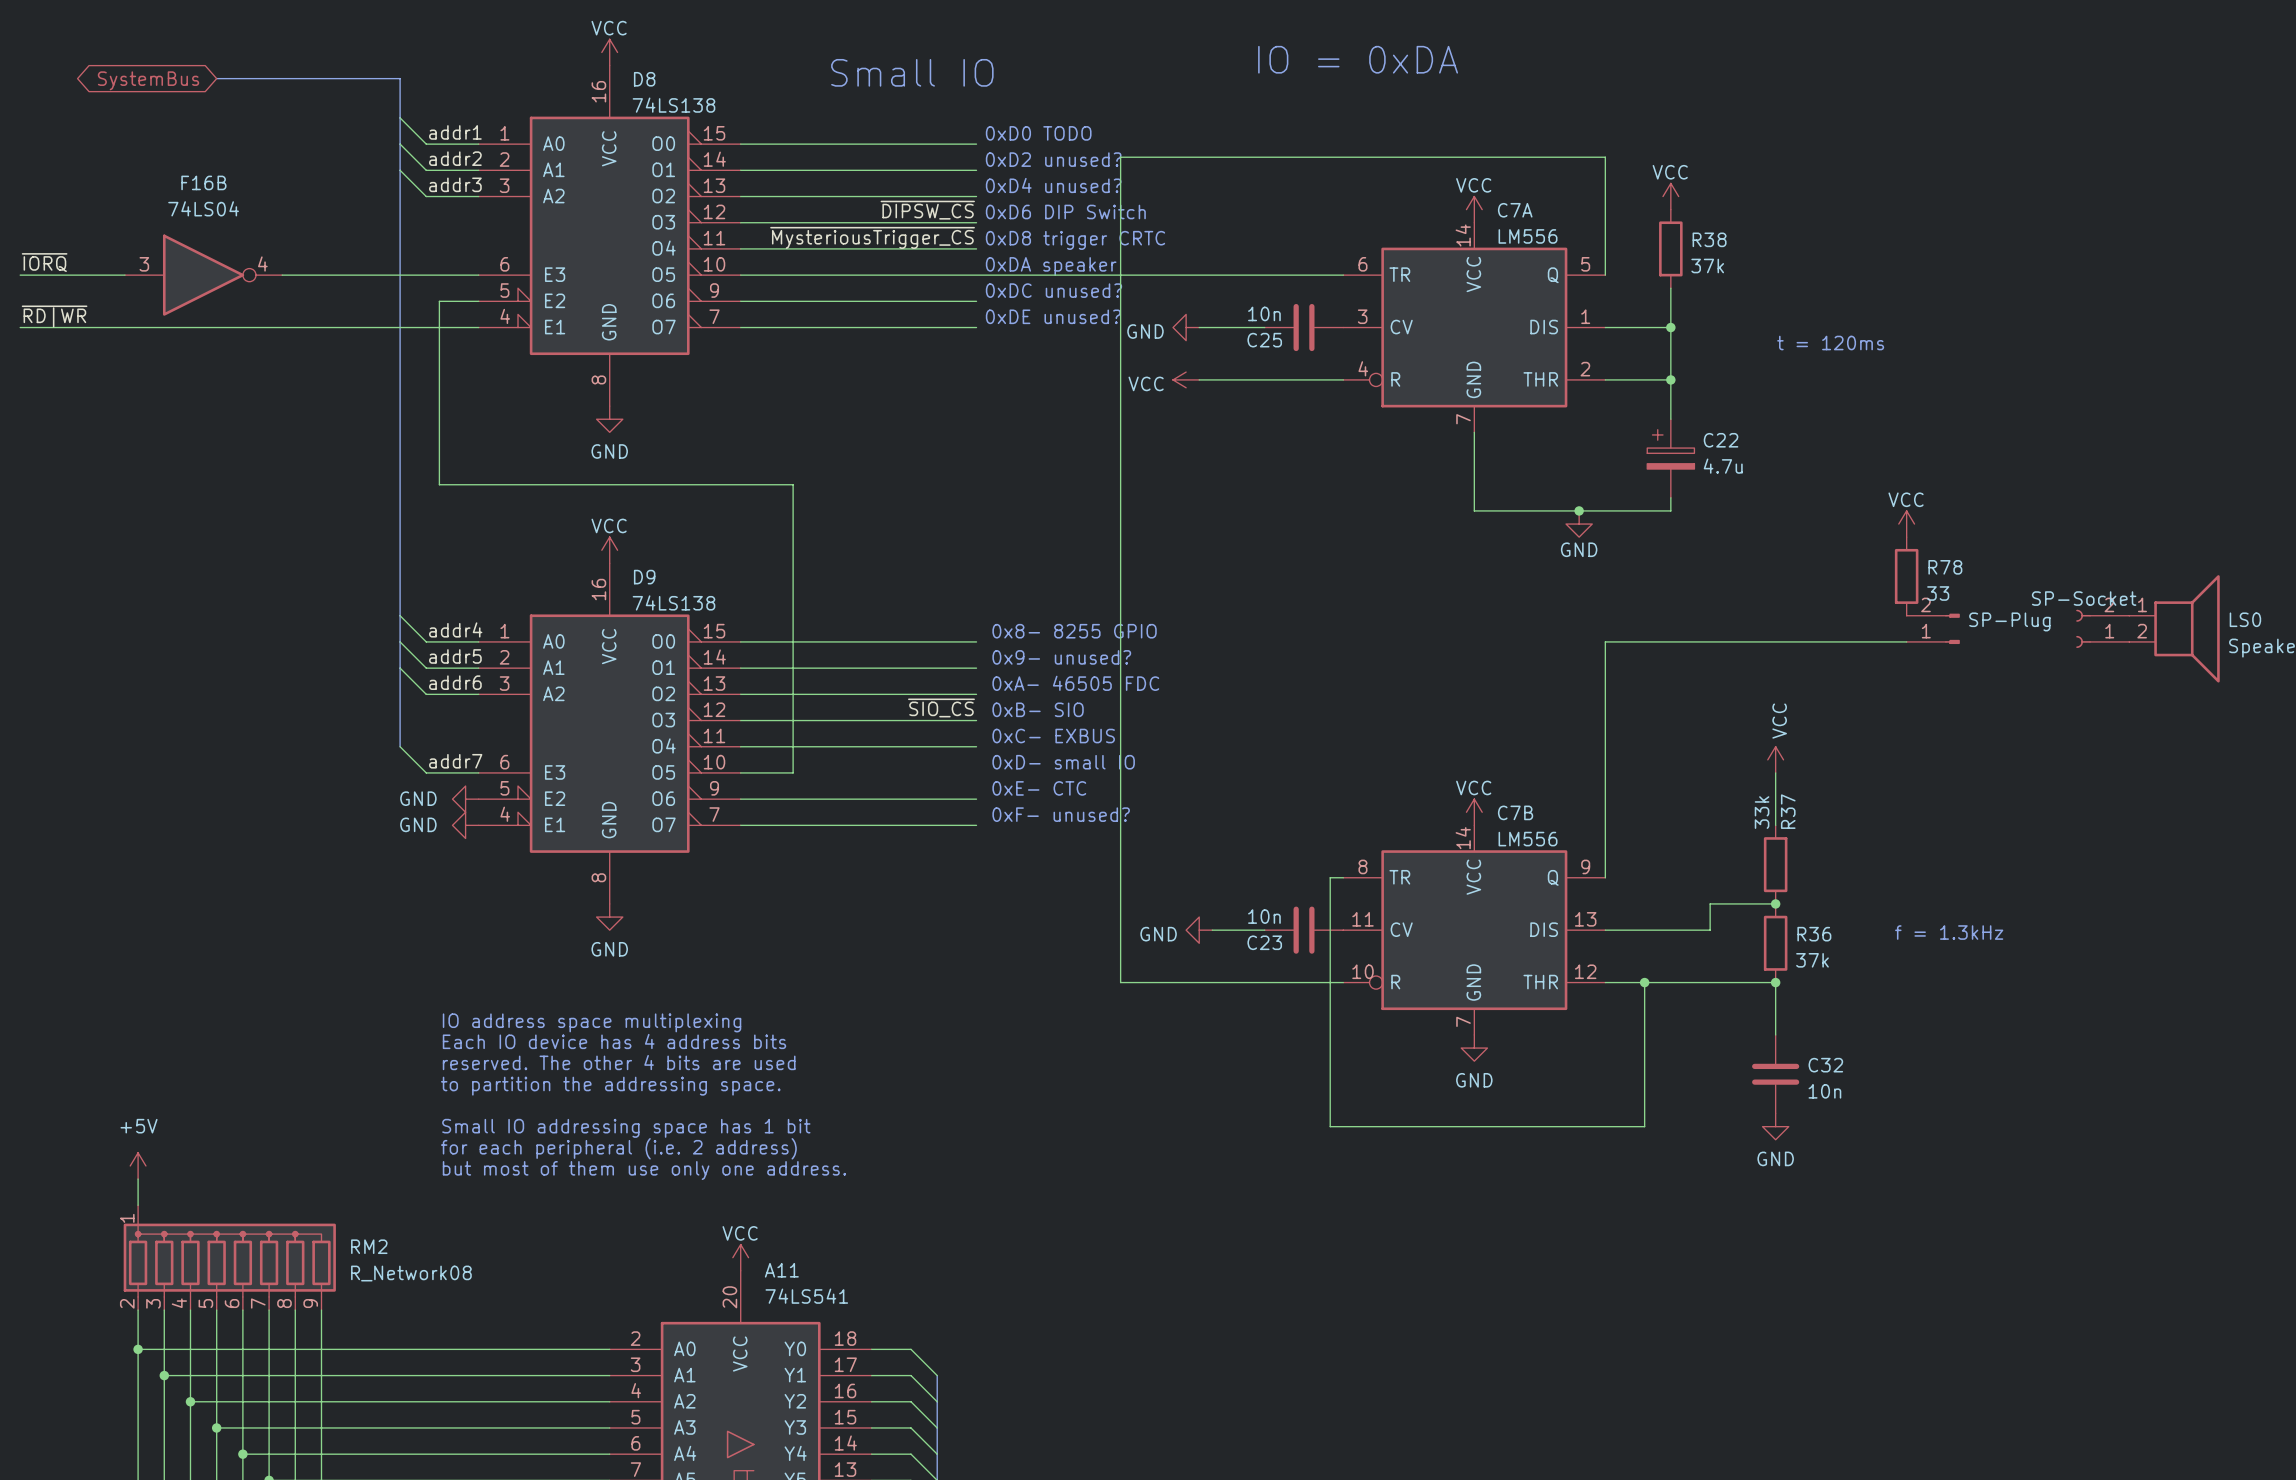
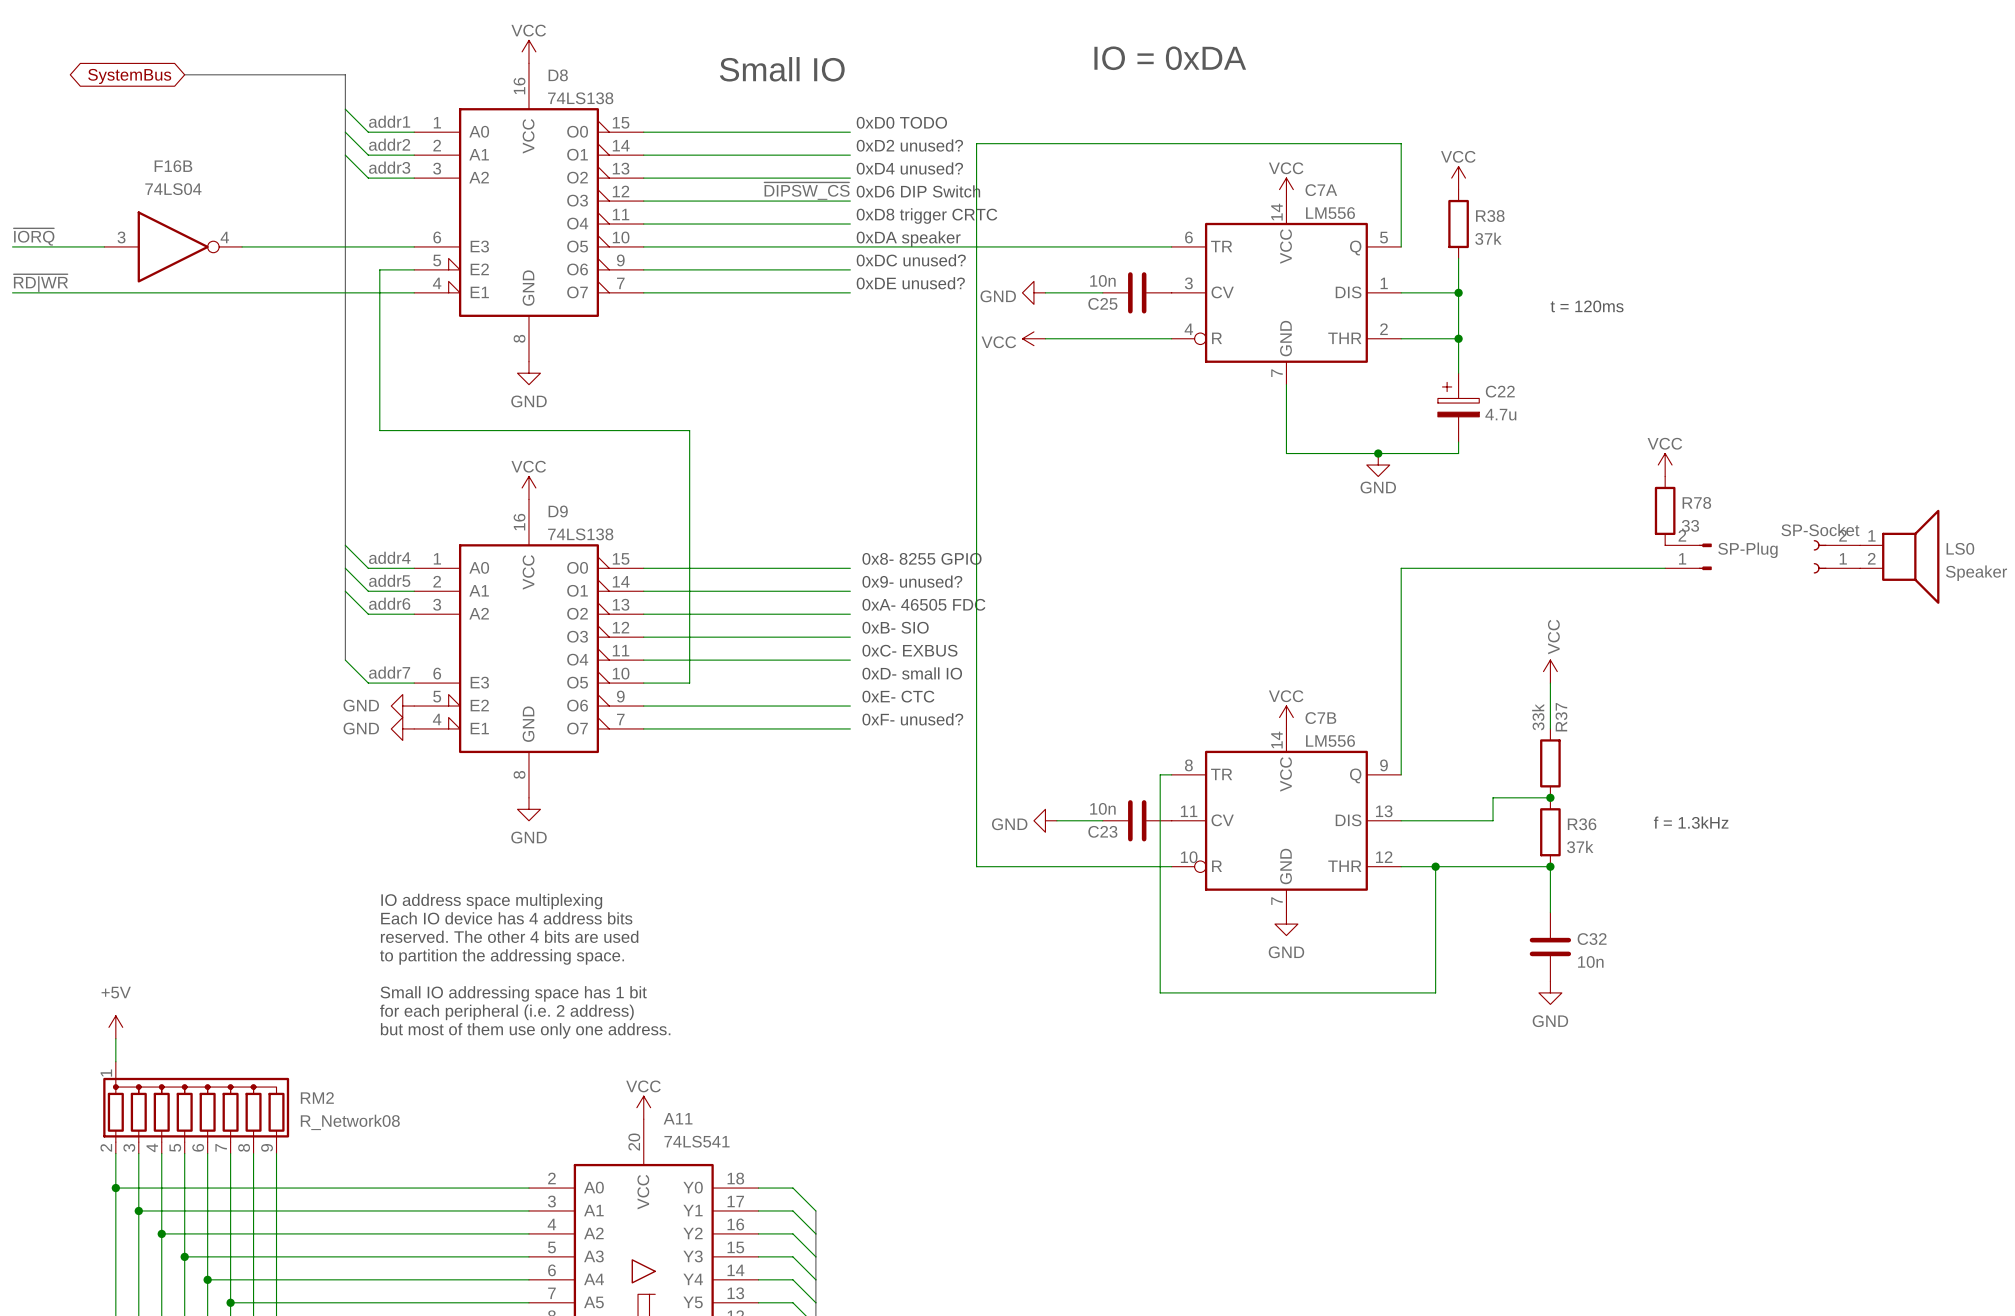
label: ~{MysteriousTrigger_CS} (872, 237) -> none
label: ~{SIO_CS} (941, 707) -> none

